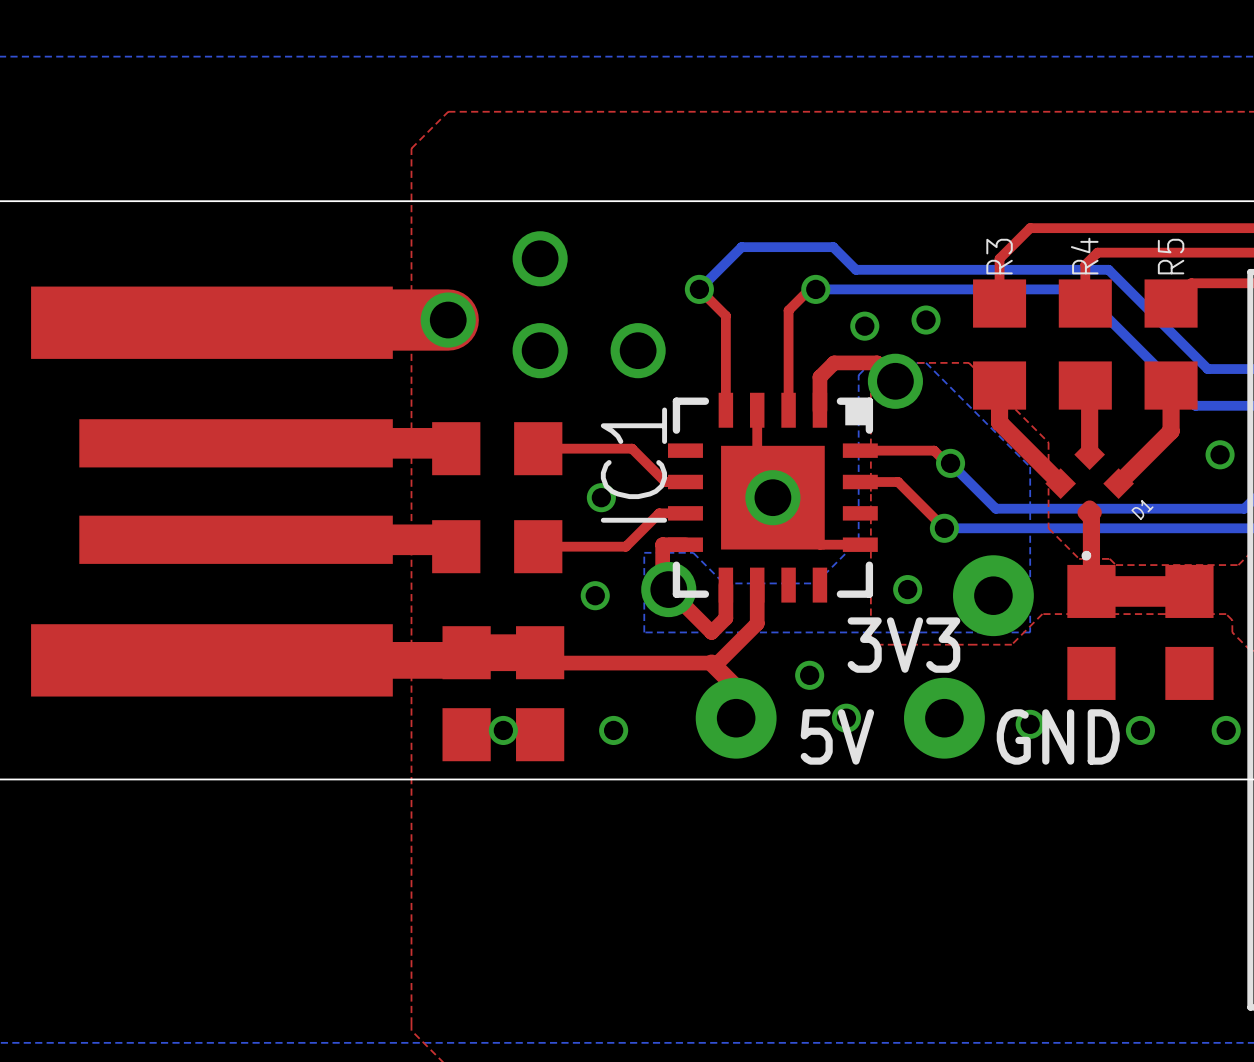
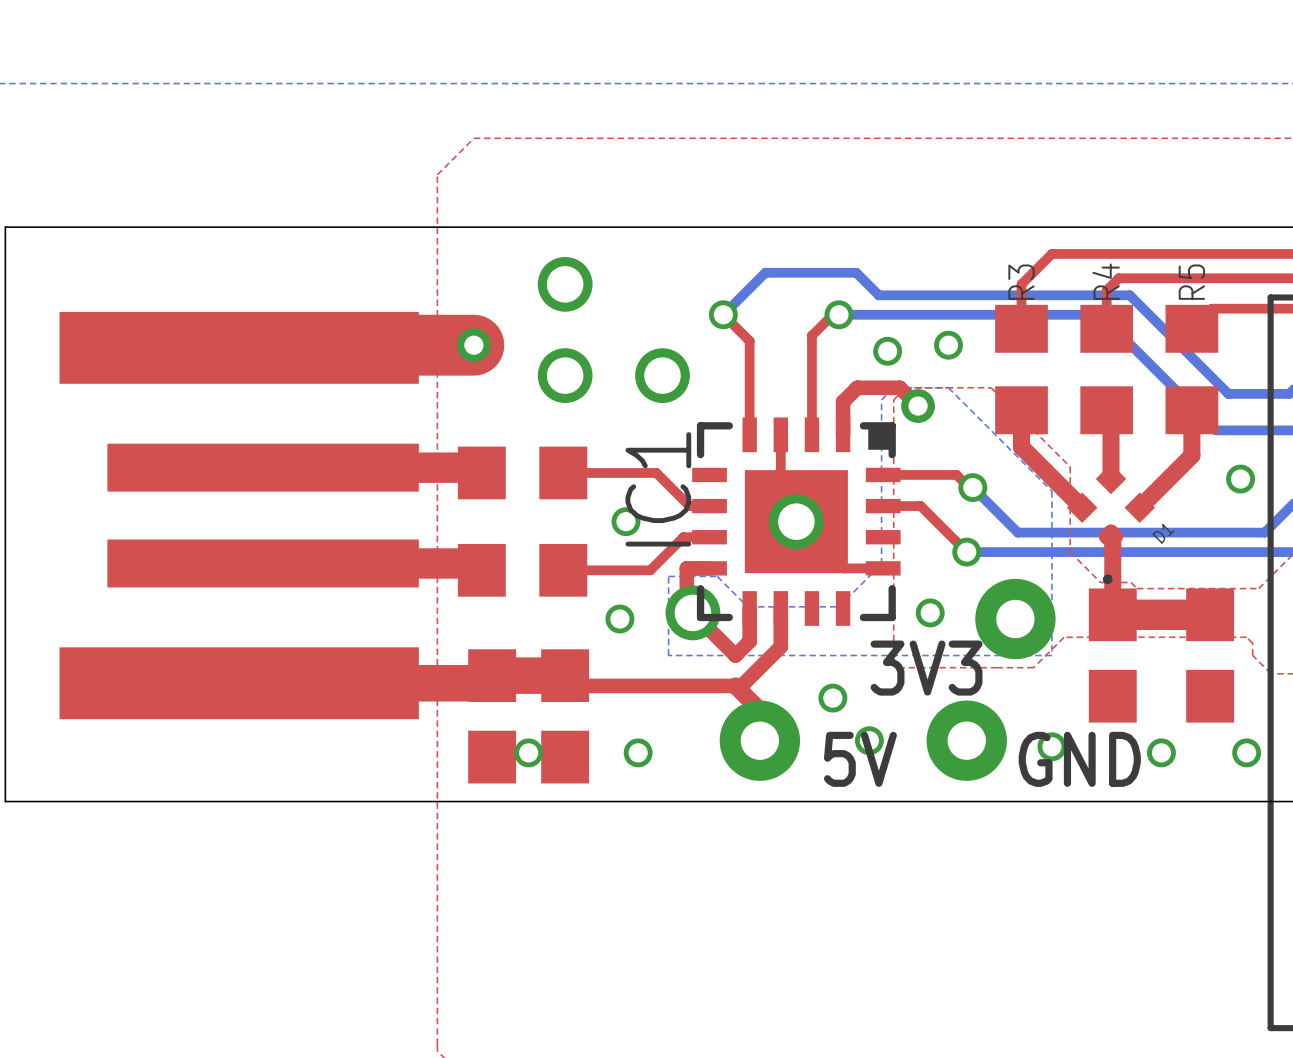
via size: [420, 292, 476, 348] -> [457, 328, 491, 363]
via size: [867, 353, 923, 409] -> [901, 389, 935, 423]

